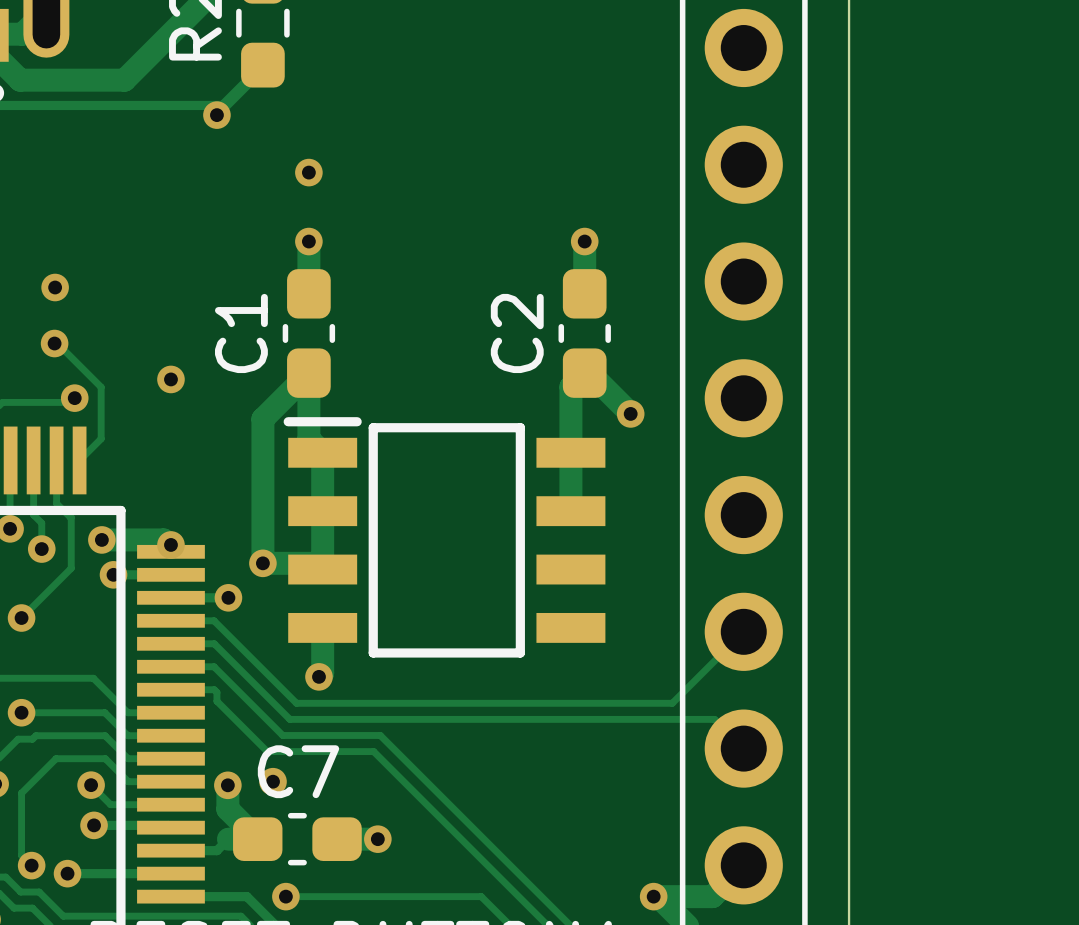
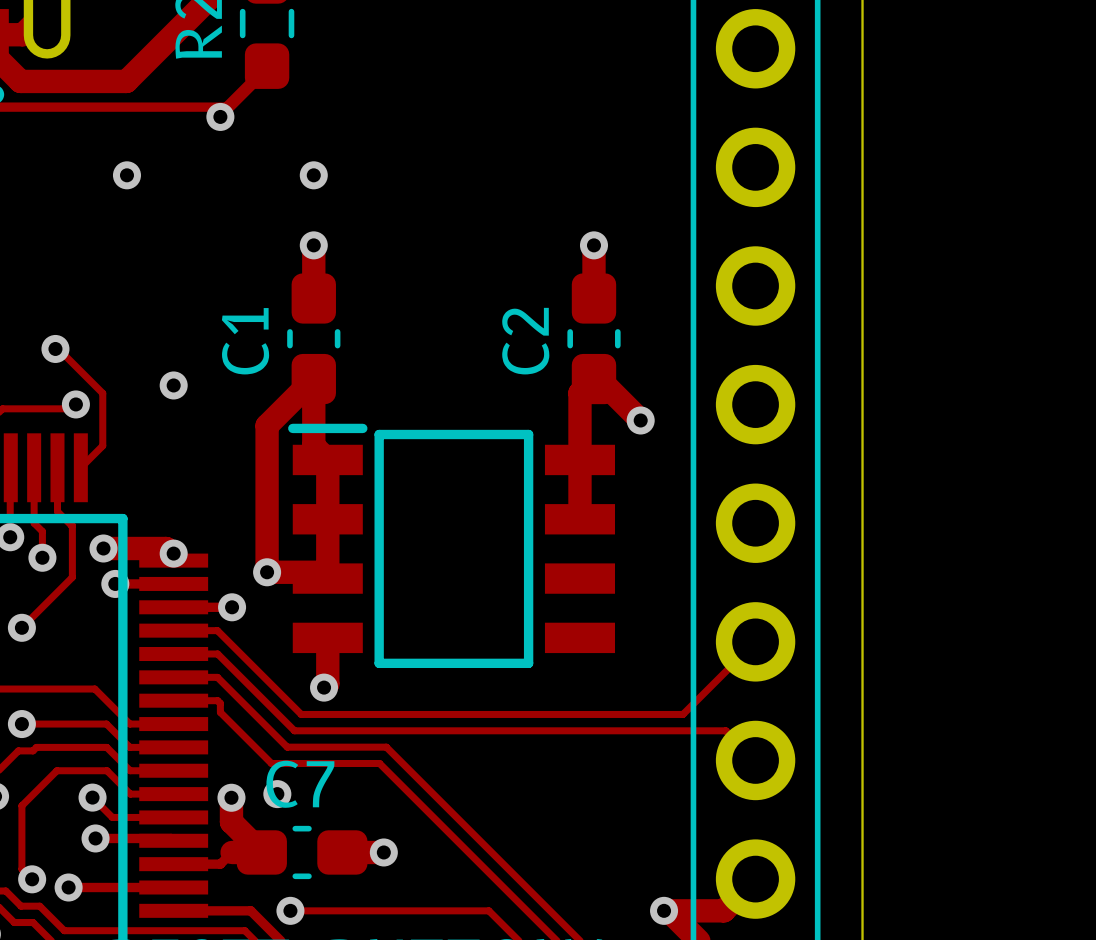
via position: (55, 287) -> (126, 175)

